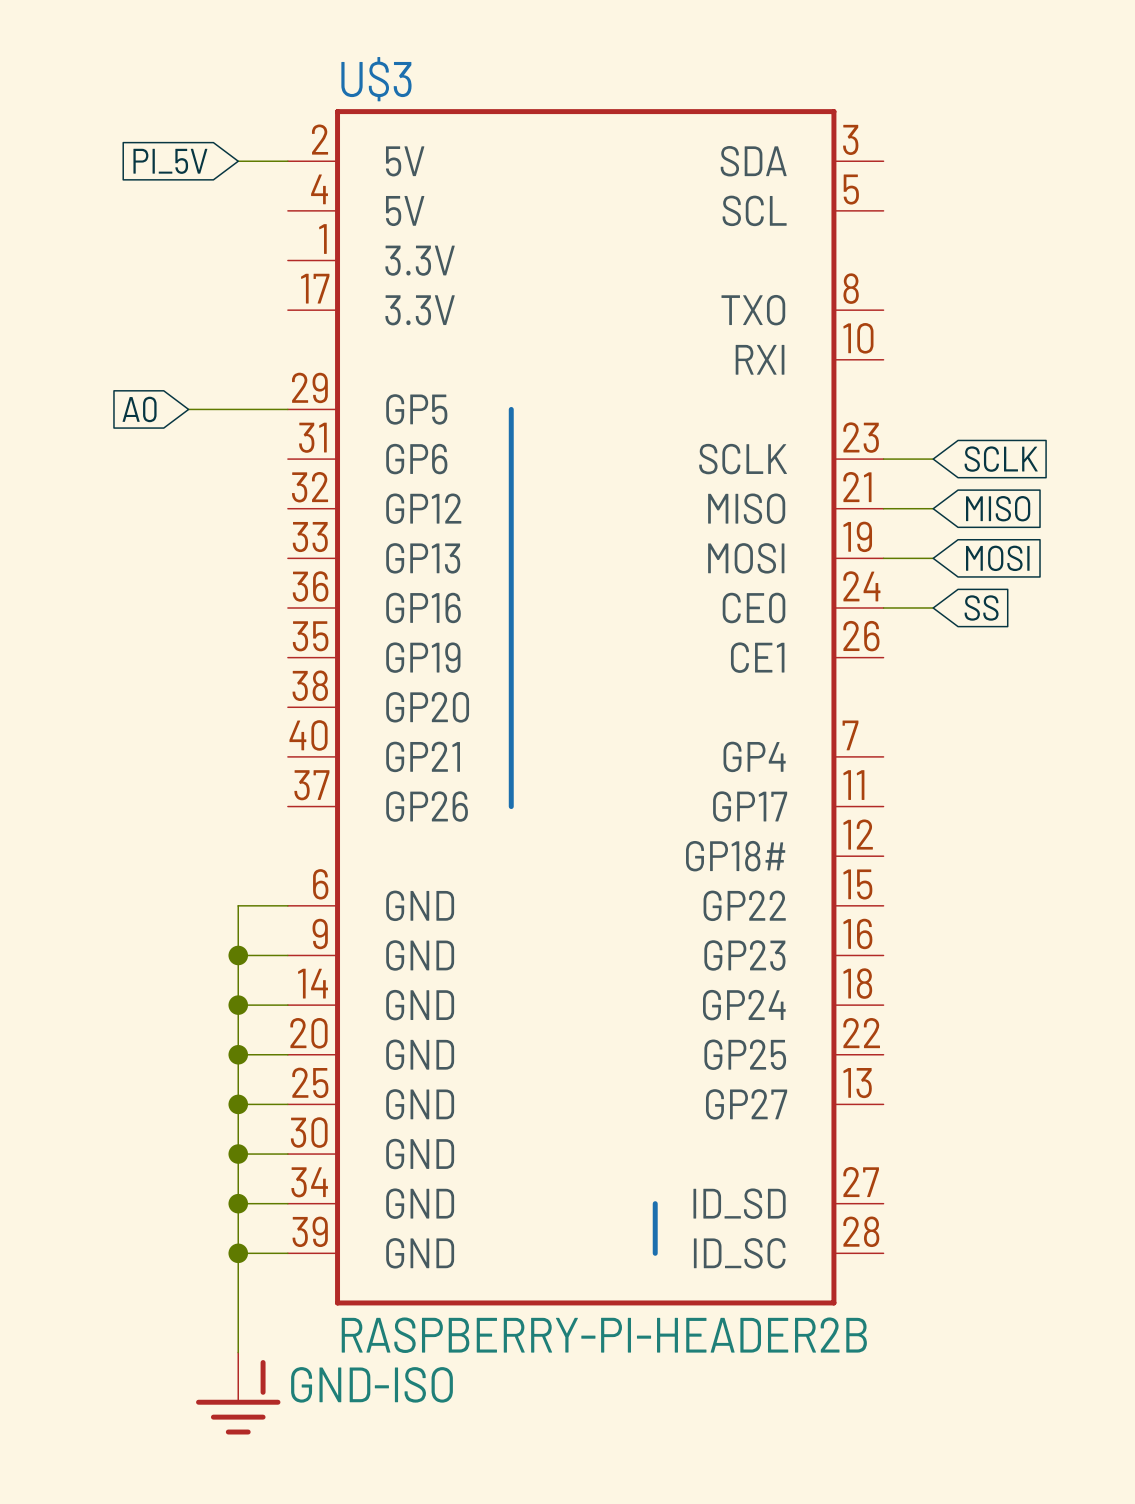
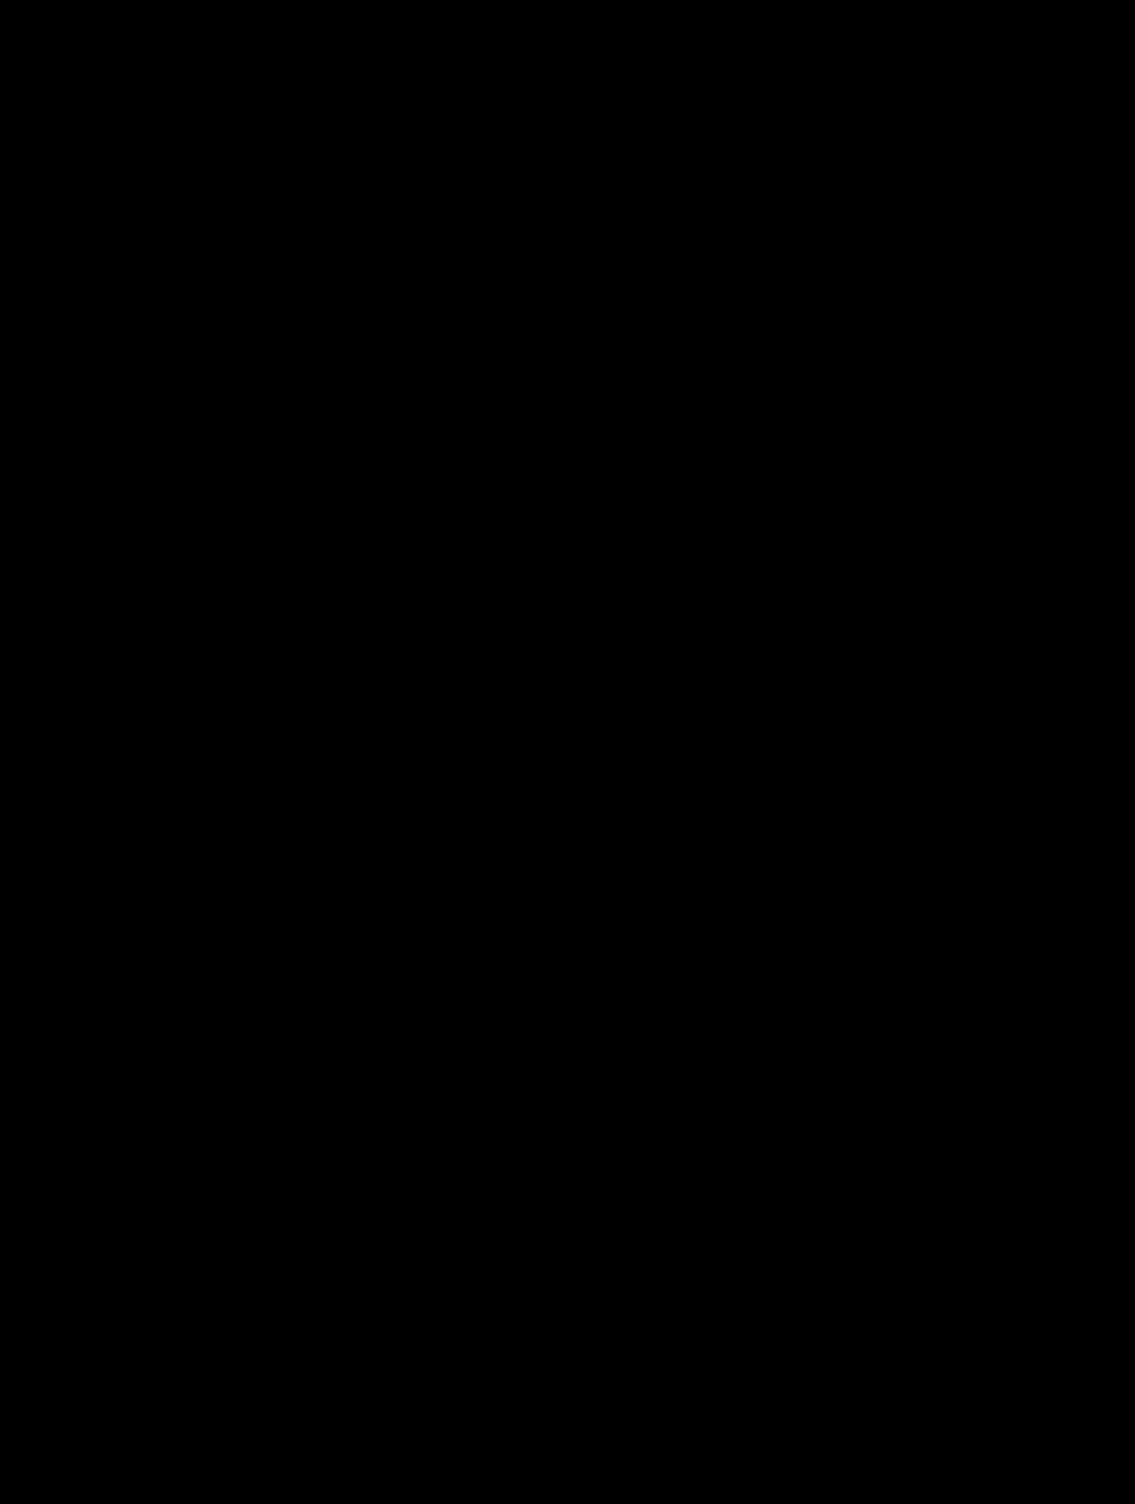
global label: PI_5V (170, 161) -> none
wire: (238, 161) (287, 161) -> none
global label: A0 (139, 409) -> none
wire: (188, 409) (287, 409) -> none
wire: (883, 459) (933, 459) -> none
global label: SCLK (1001, 459) -> none
wire: (883, 508) (933, 508) -> none
global label: MISO (998, 508) -> none
wire: (883, 558) (933, 558) -> none
global label: MOSI (997, 558) -> none
wire: (883, 607) (933, 607) -> none
global label: SS (981, 607) -> none
U$3: RASPBERRY-PI-HEADER2B (585, 707) -> none
wire: (287, 905) (238, 905) (238, 1352) -> none
wire: (238, 955) (287, 955) -> none
junction: (238, 955) -> none
wire: (238, 1005) (287, 1005) -> none
junction: (238, 1005) -> none
wire: (238, 1054) (287, 1054) -> none
junction: (238, 1054) -> none
wire: (238, 1104) (287, 1104) -> none
junction: (238, 1104) -> none
wire: (238, 1154) (287, 1154) -> none
junction: (238, 1154) -> none
wire: (238, 1203) (287, 1203) -> none
junction: (238, 1203) -> none
wire: (238, 1253) (287, 1253) -> none
junction: (238, 1253) -> none
power symbol: GND-ISO (238, 1393) -> none

